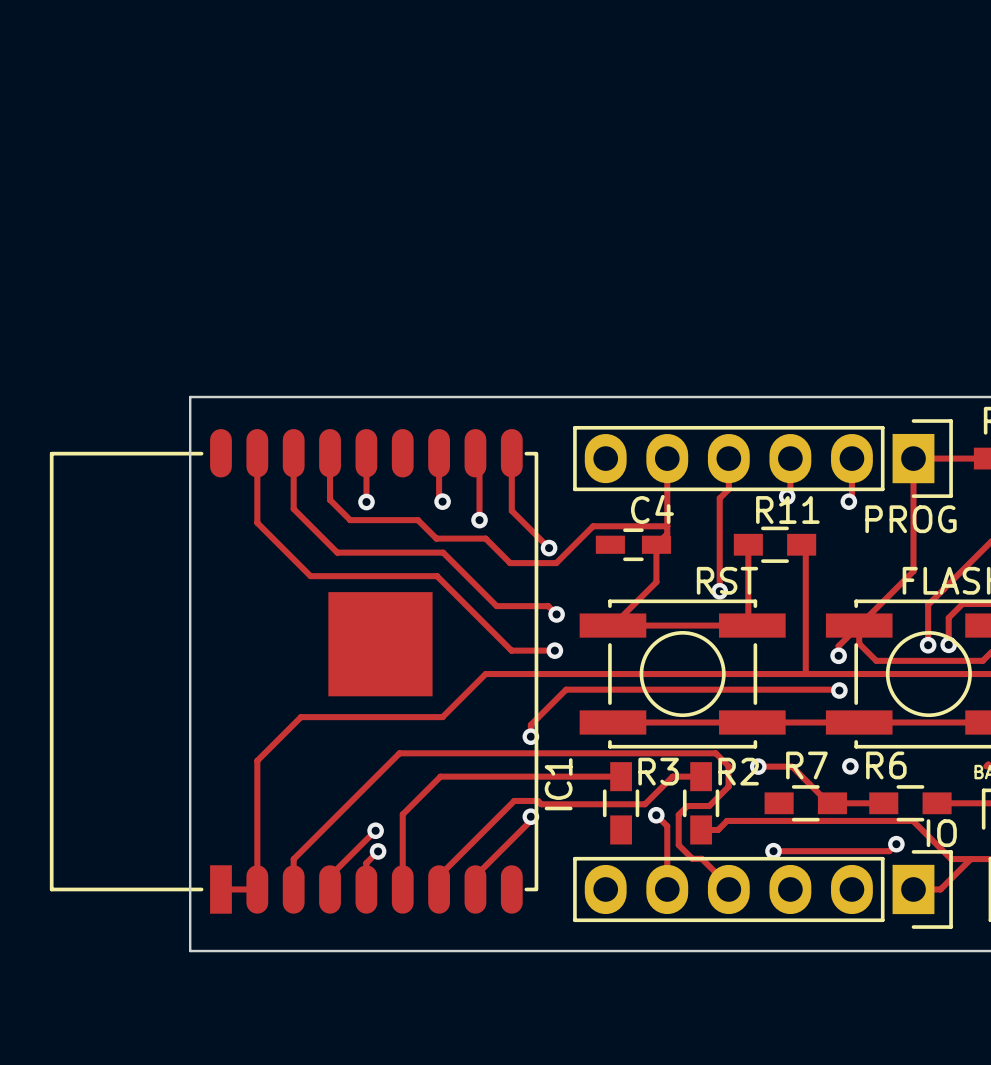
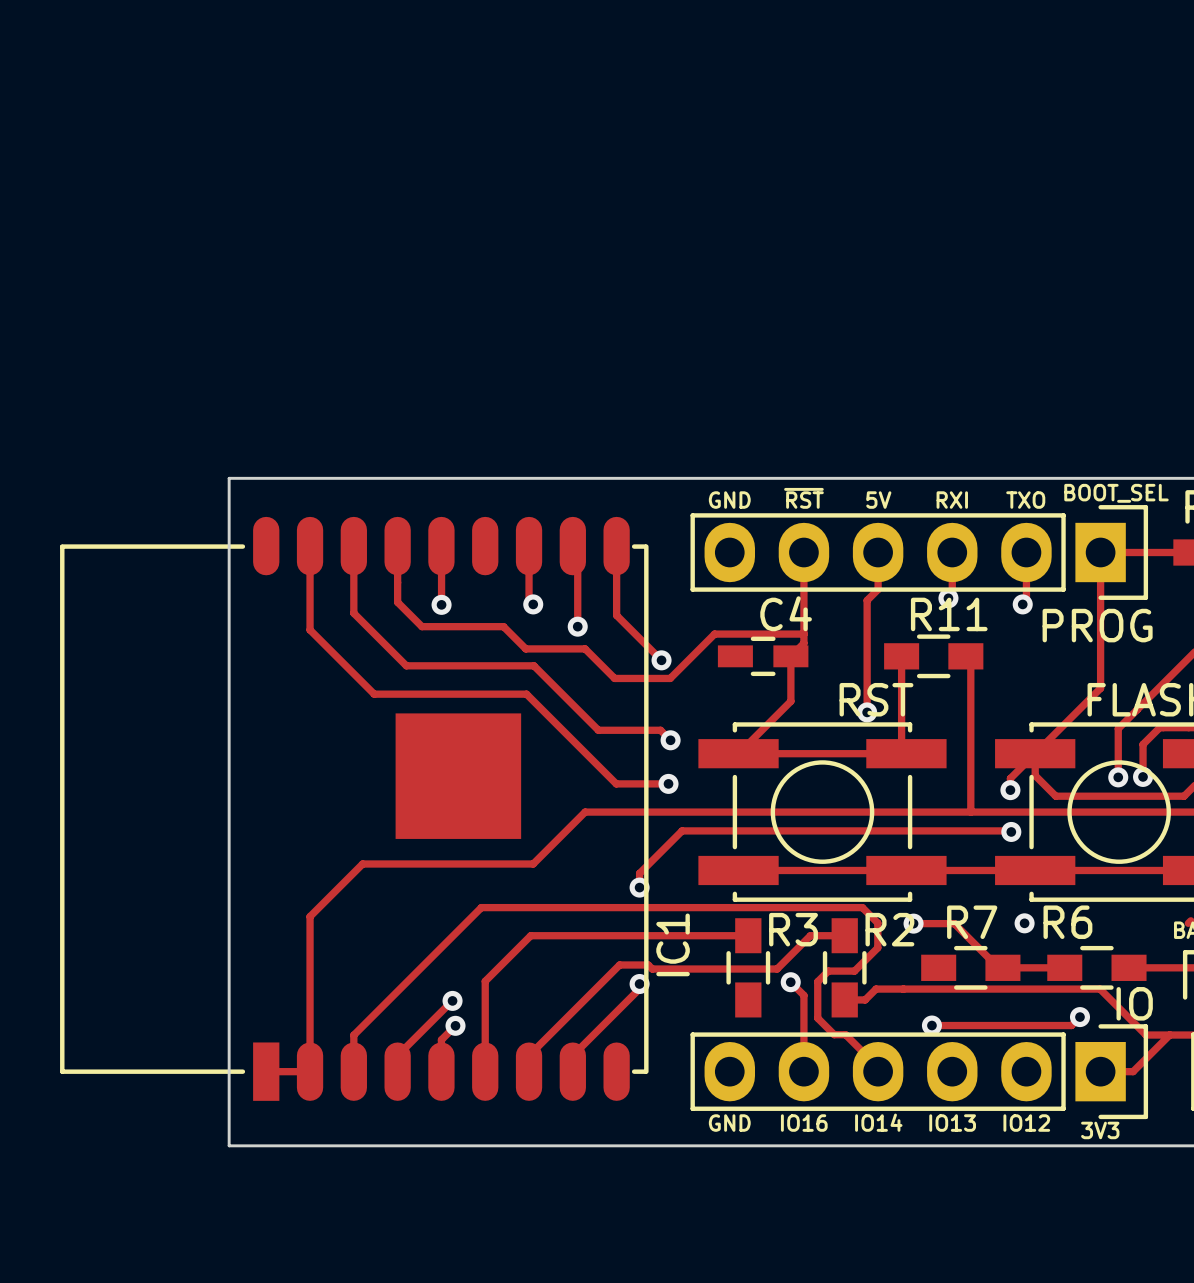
text: none -> BOOT_SEL (1116, 493)
text: none -> ~{RST} (803, 498)
text: none -> GND (729, 500)
text: none -> 5V (878, 500)
text: none -> RXI (952, 500)
text: none -> TXO (1025, 500)
text: none -> IO14 (878, 1122)
text: none -> GND (729, 1123)
text: none -> IO16 (804, 1123)
text: none -> IO13 (952, 1123)
text: none -> IO12 (1026, 1123)
text: none -> 3V3 (1100, 1130)

